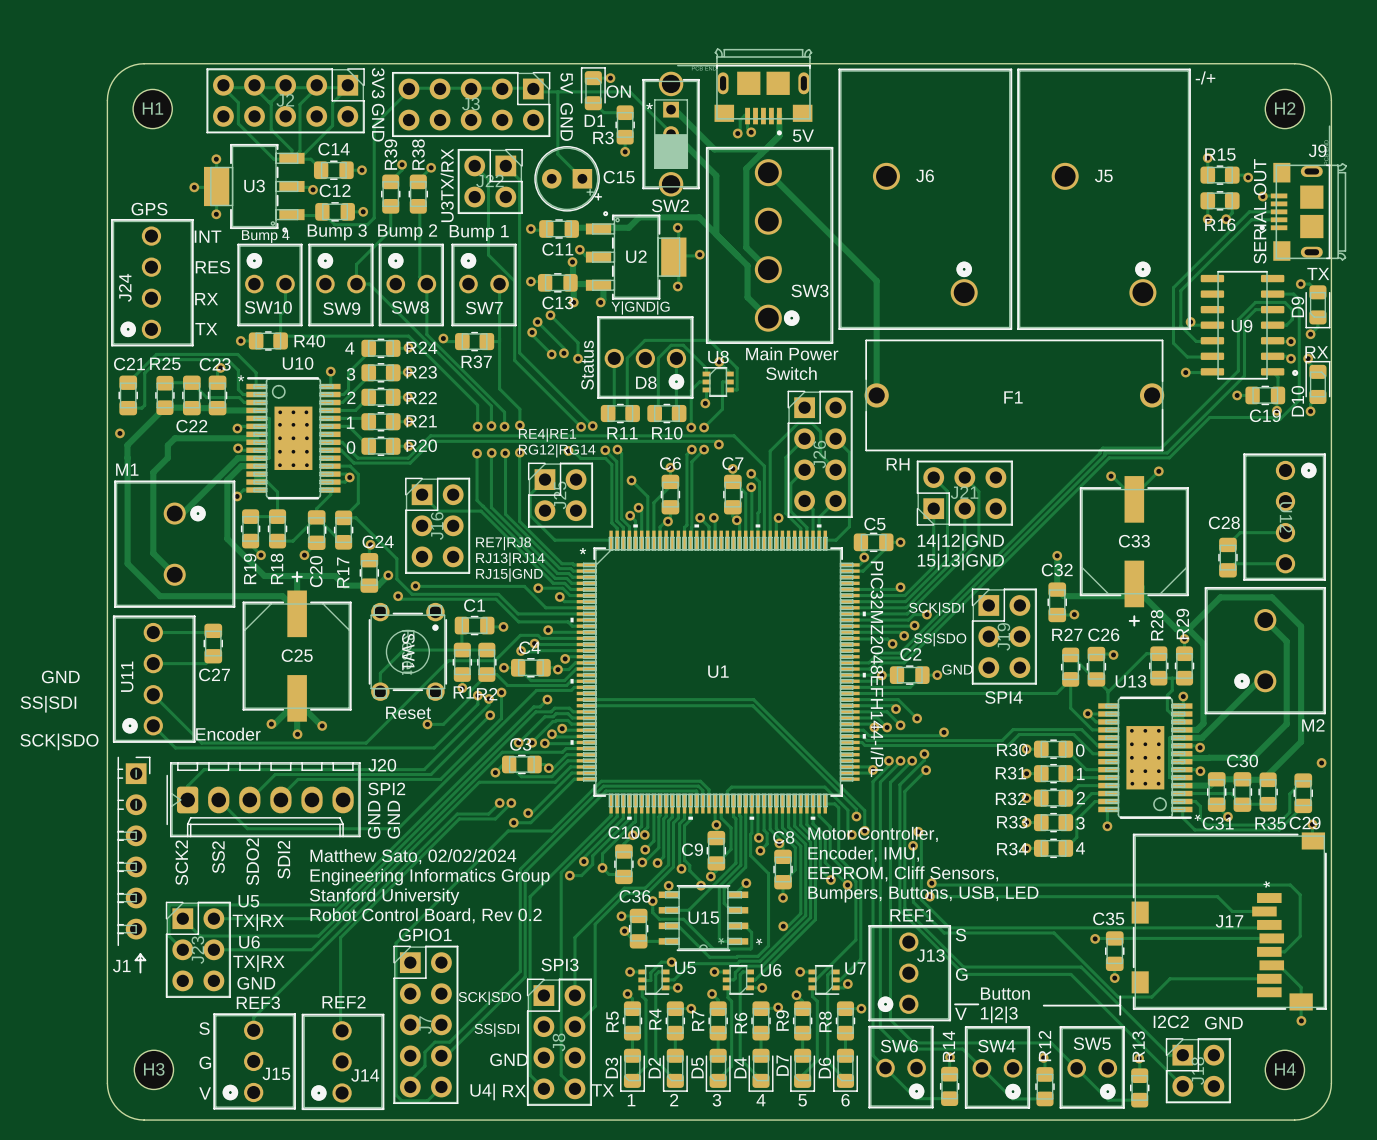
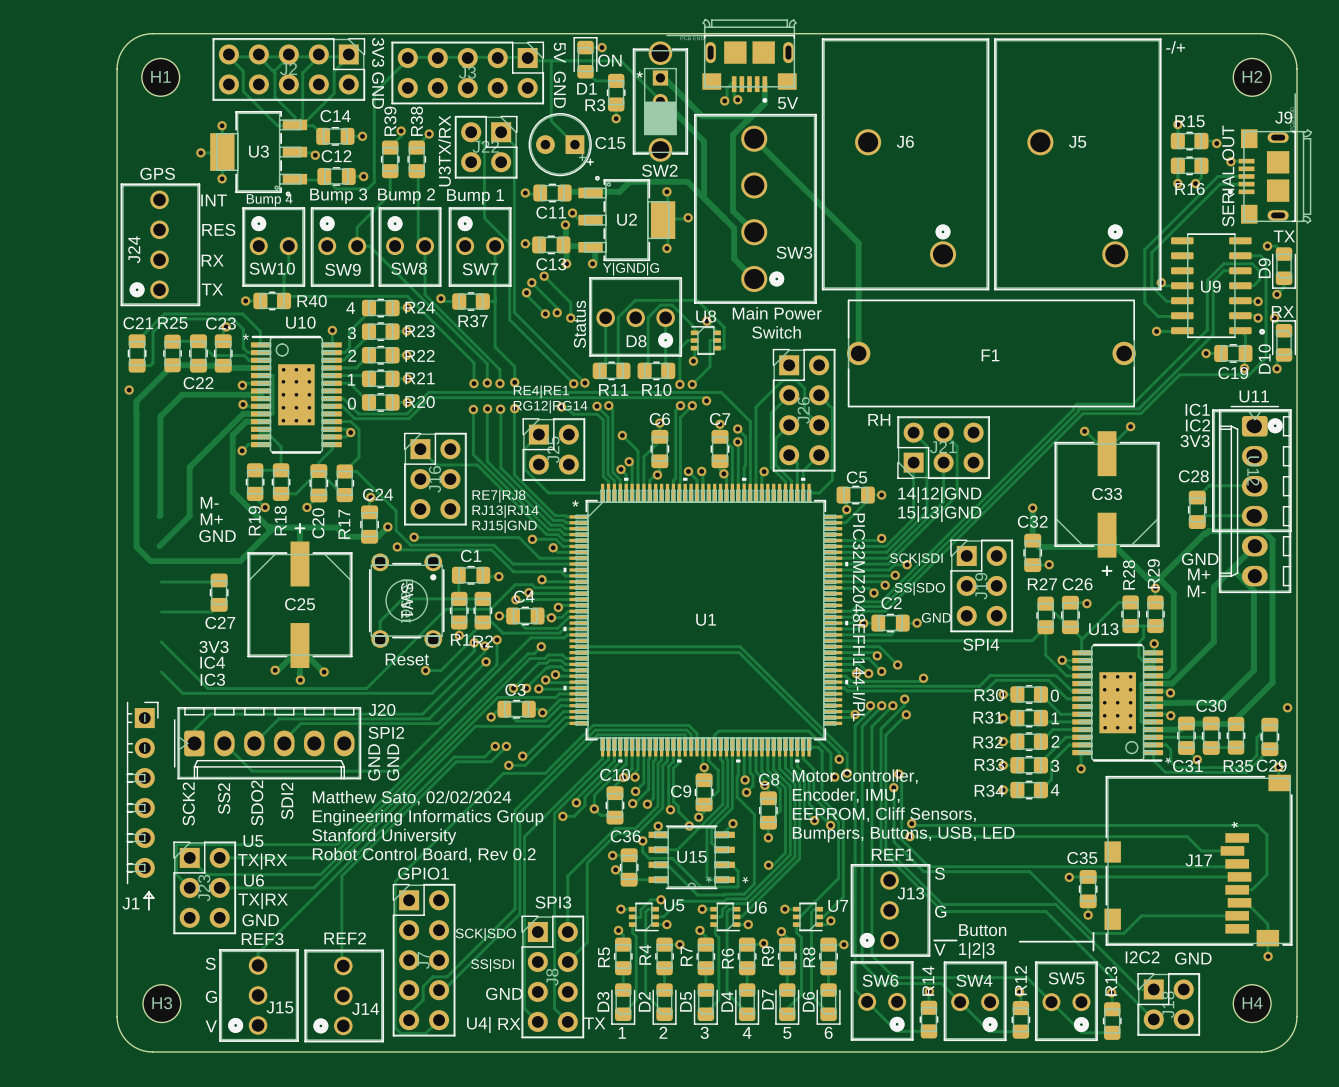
track: (167, 445) (167, 457) (153, 472) (153, 553) (174, 574) -> (175, 401) (160, 416) (159, 516)
text: none -> IC1 (1197, 409)
text: none -> IC2 (1198, 425)
text: none -> 3V3 (1195, 441)
track: none -> (189, 467) (189, 516) (159, 546)
M1: (174, 544) -> none
text: none -> M- (209, 502)
track: (127, 563) (160, 596) (282, 596) (297, 610) -> (136, 515) (136, 546) (150, 561) (240, 561) (271, 530) (271, 527)
text: none -> M+ (211, 519)
track: (1220, 597) (1272, 597) (1301, 626) (1301, 741) -> (1190, 548) (1208, 531) (1263, 531) (1272, 540) (1272, 682) (1267, 687)
text: none -> GND (1200, 559)
U11 footprint: [112, 615, 196, 743] -> [1218, 405, 1292, 594]
text: none -> M+ (1199, 574)
text: none -> M- (1196, 591)
M2: (1265, 650) -> none
text position: GND (60, 676) -> GND (217, 536)
U11 name position: U11 (127, 676) -> U11 (1254, 396)
track: (1258, 681) (1245, 694) -> (1254, 546) (1213, 587) (1213, 641)
text: none -> 3V3 (213, 647)
text: SS|SDI (48, 704) -> none
text: none -> IC4 (212, 662)
text: Encoder (228, 734) -> IC3 (212, 679)
text: SCK|SDO (59, 741) -> none

